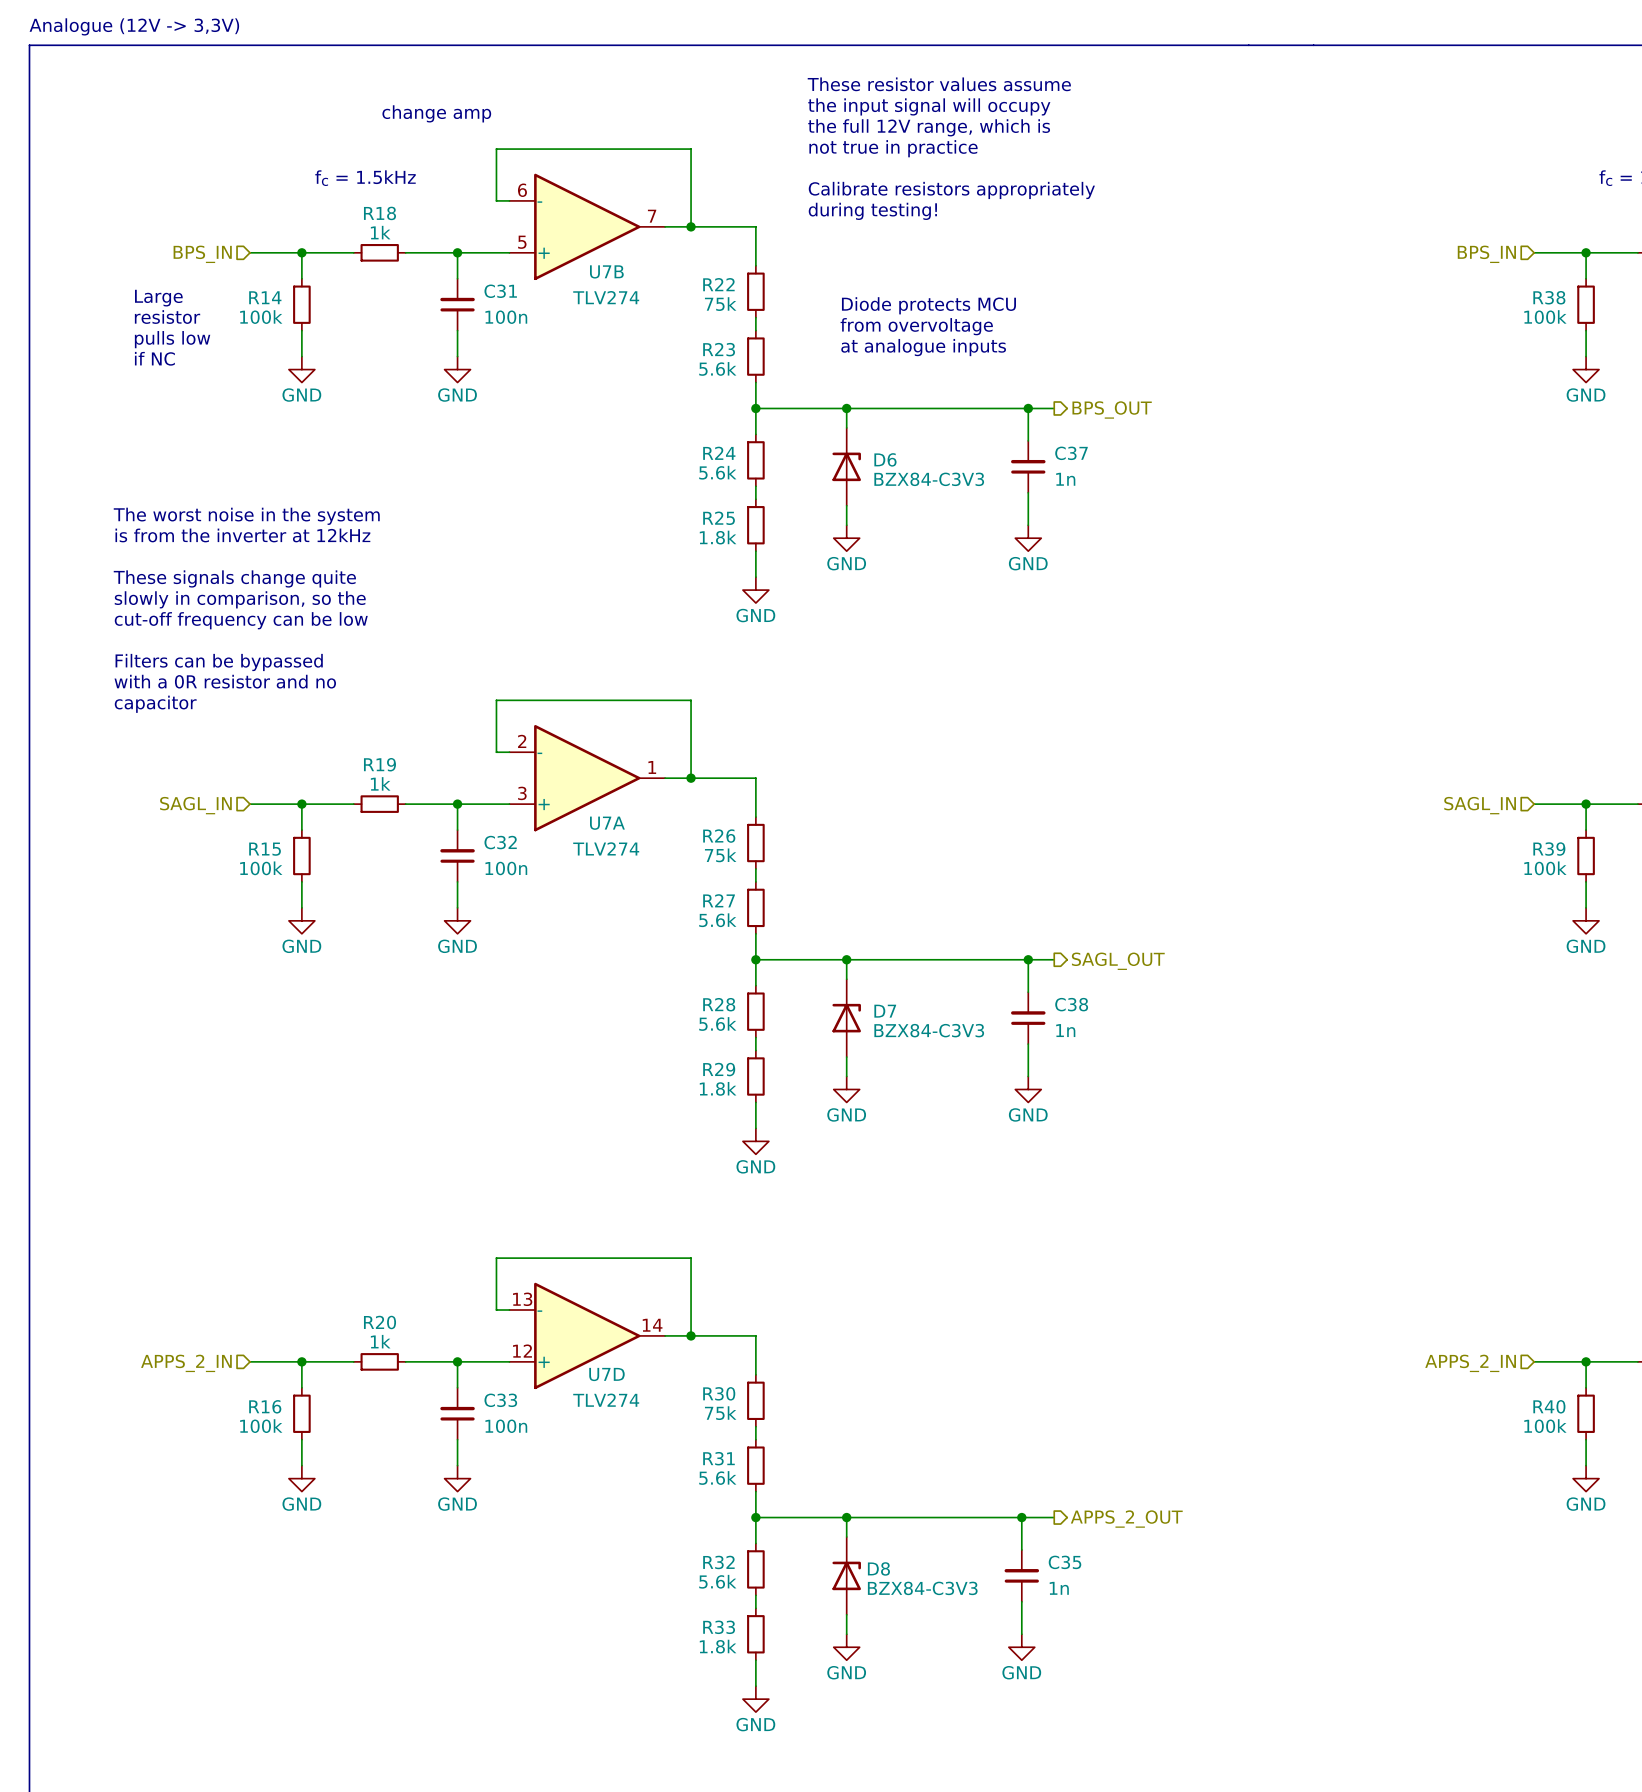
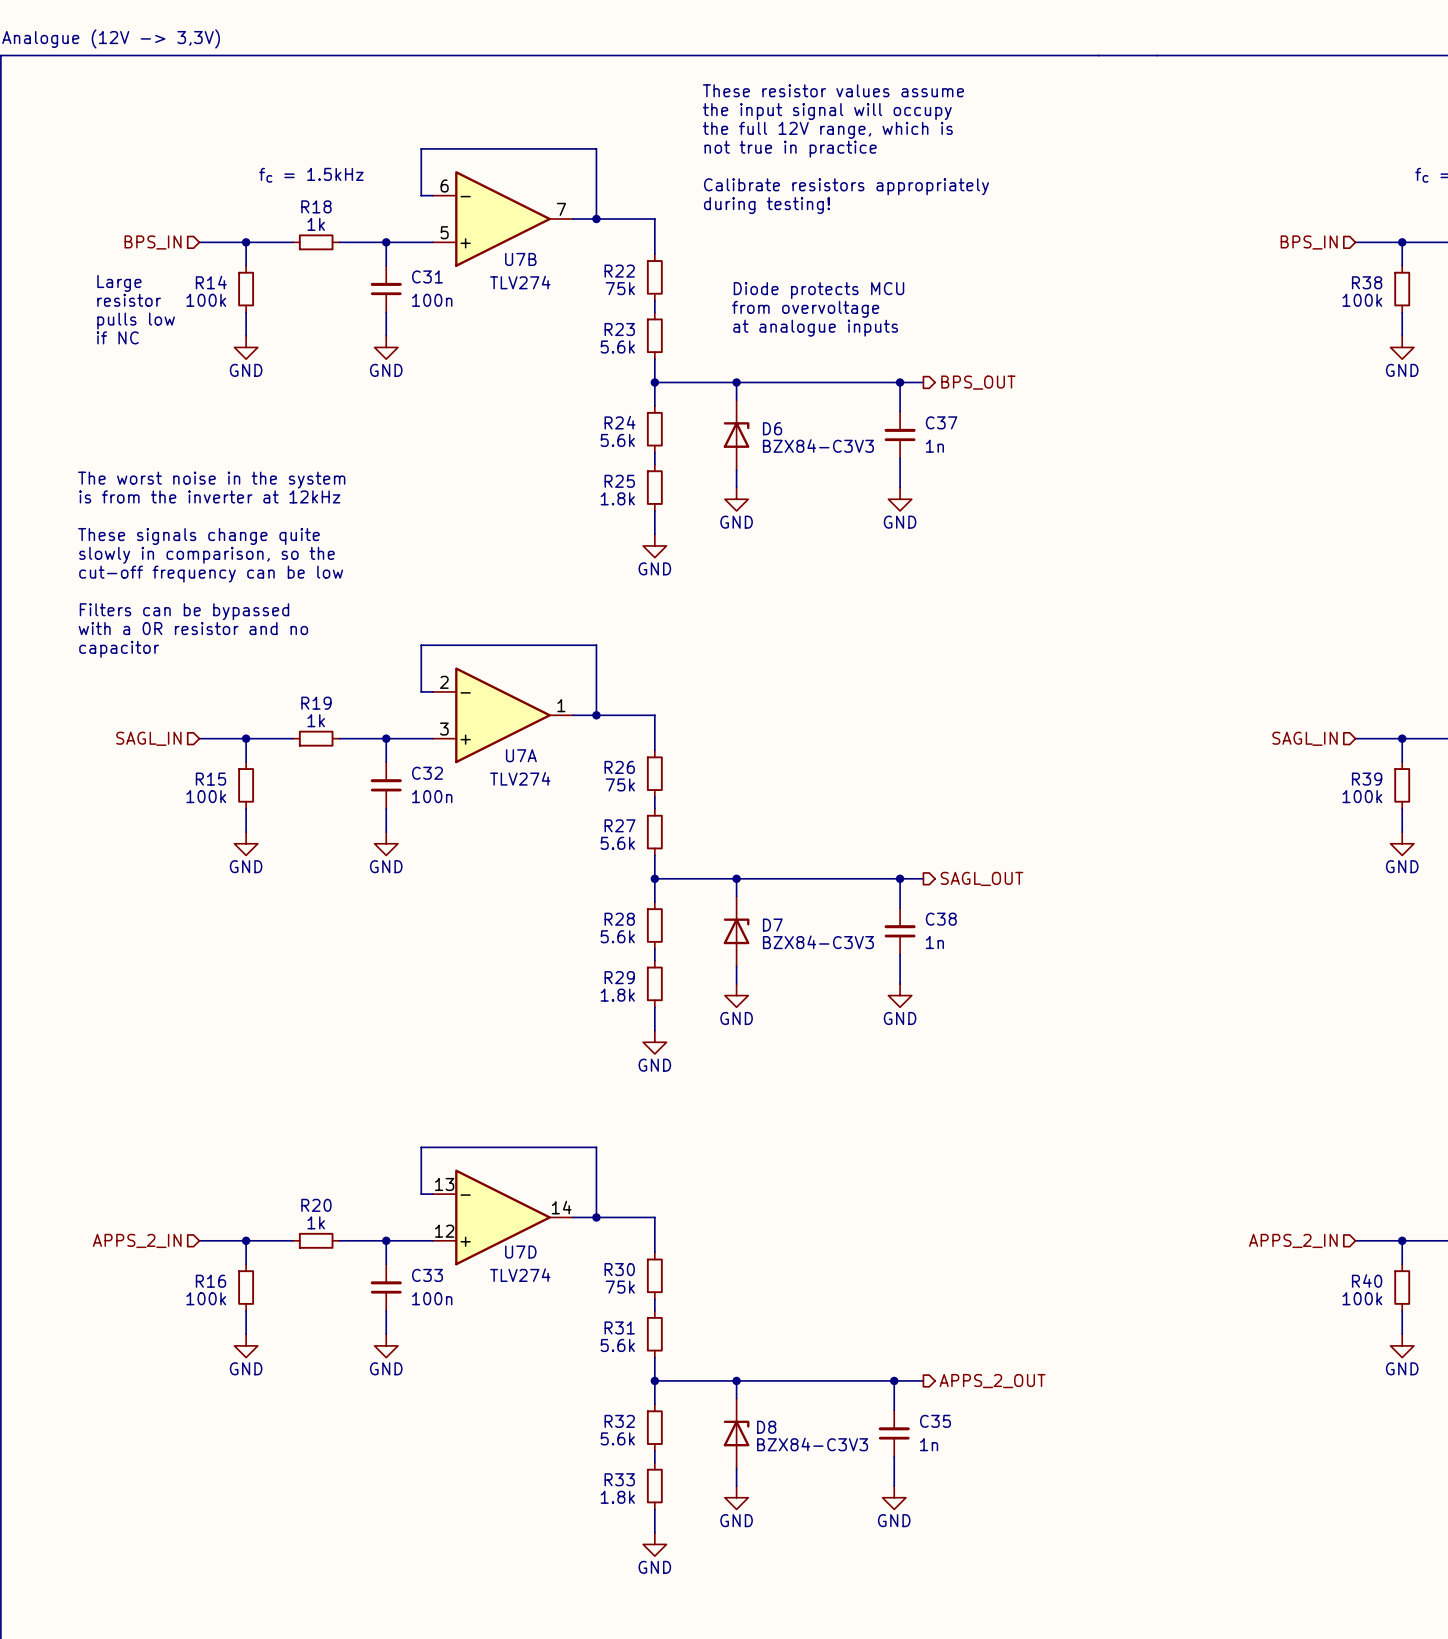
text: change amp (436, 113) -> none

